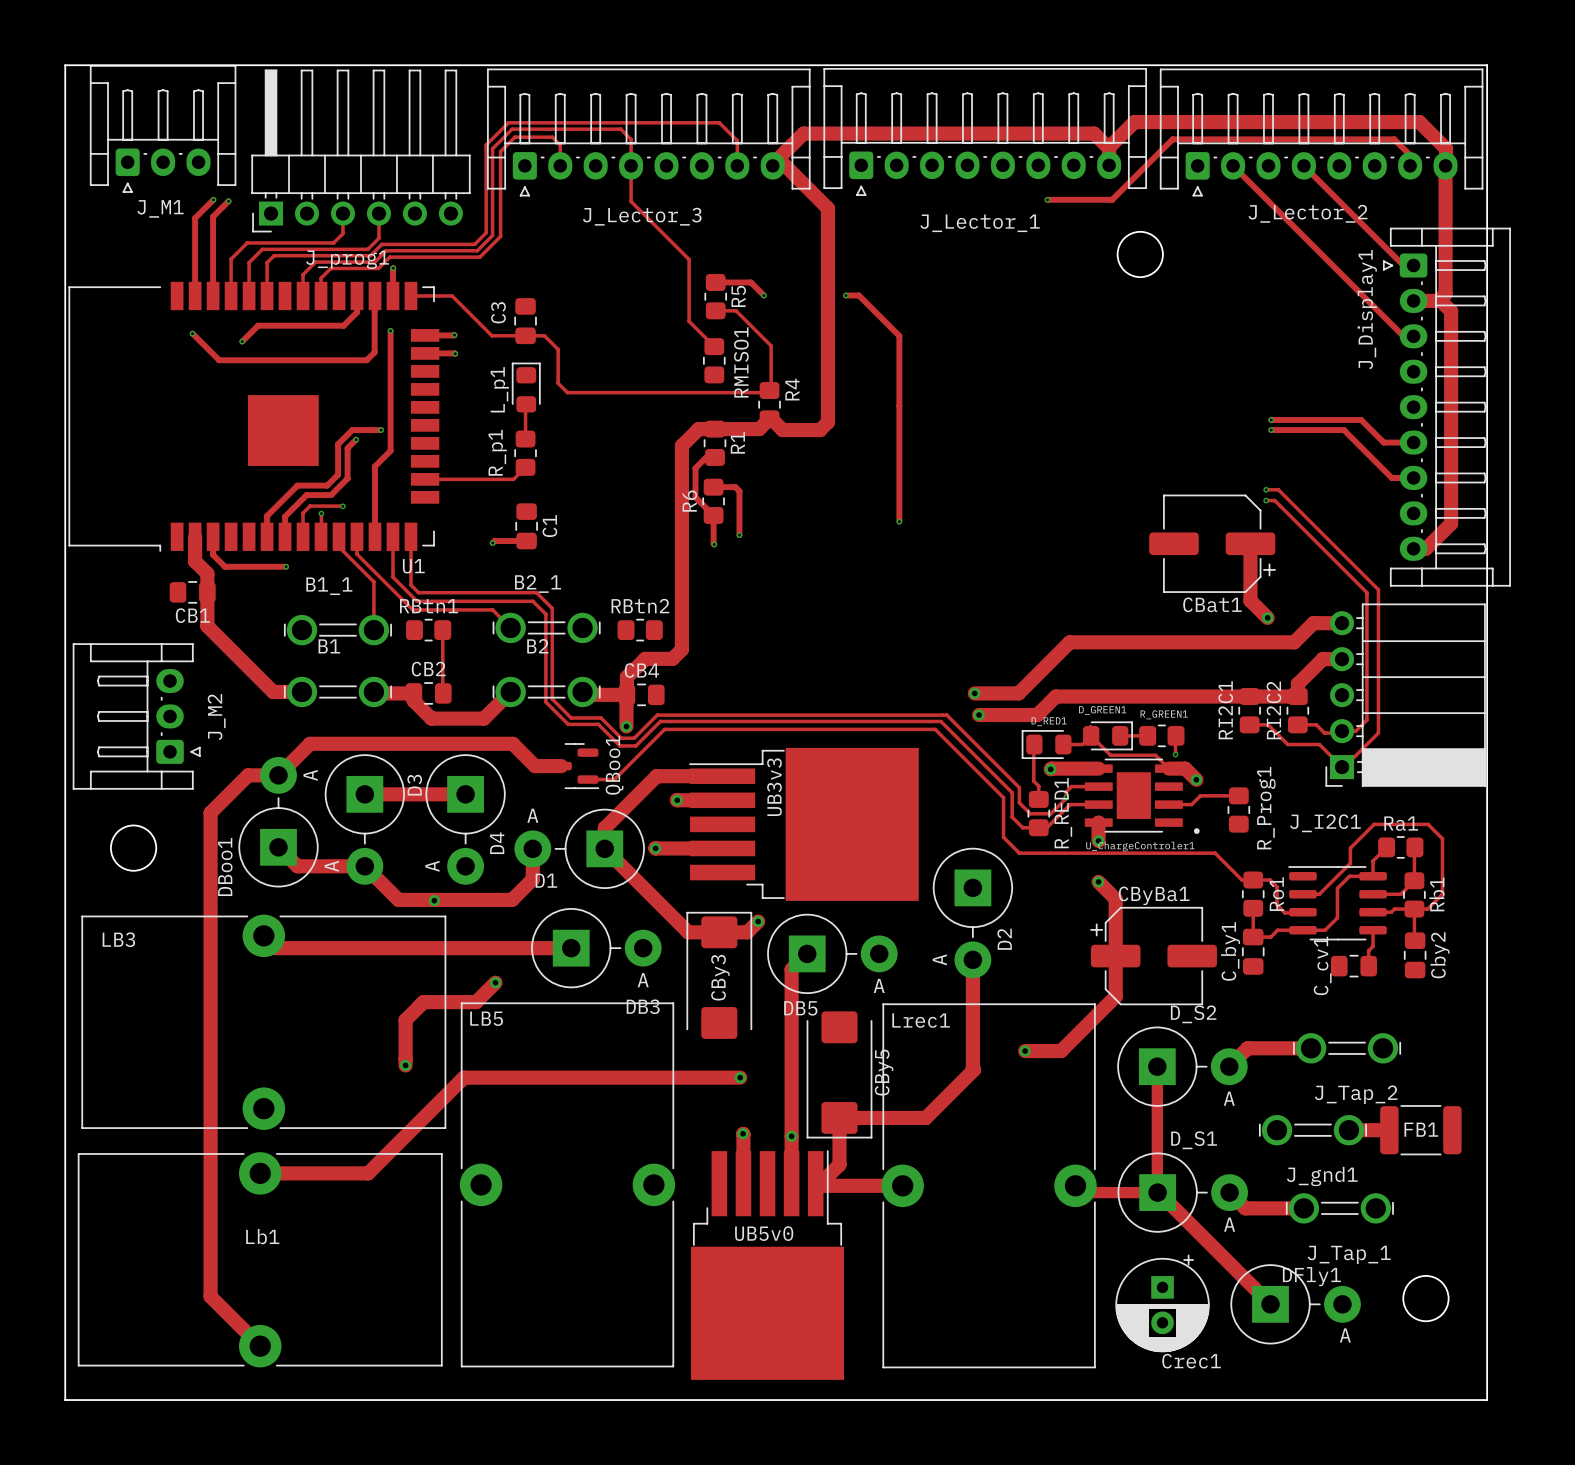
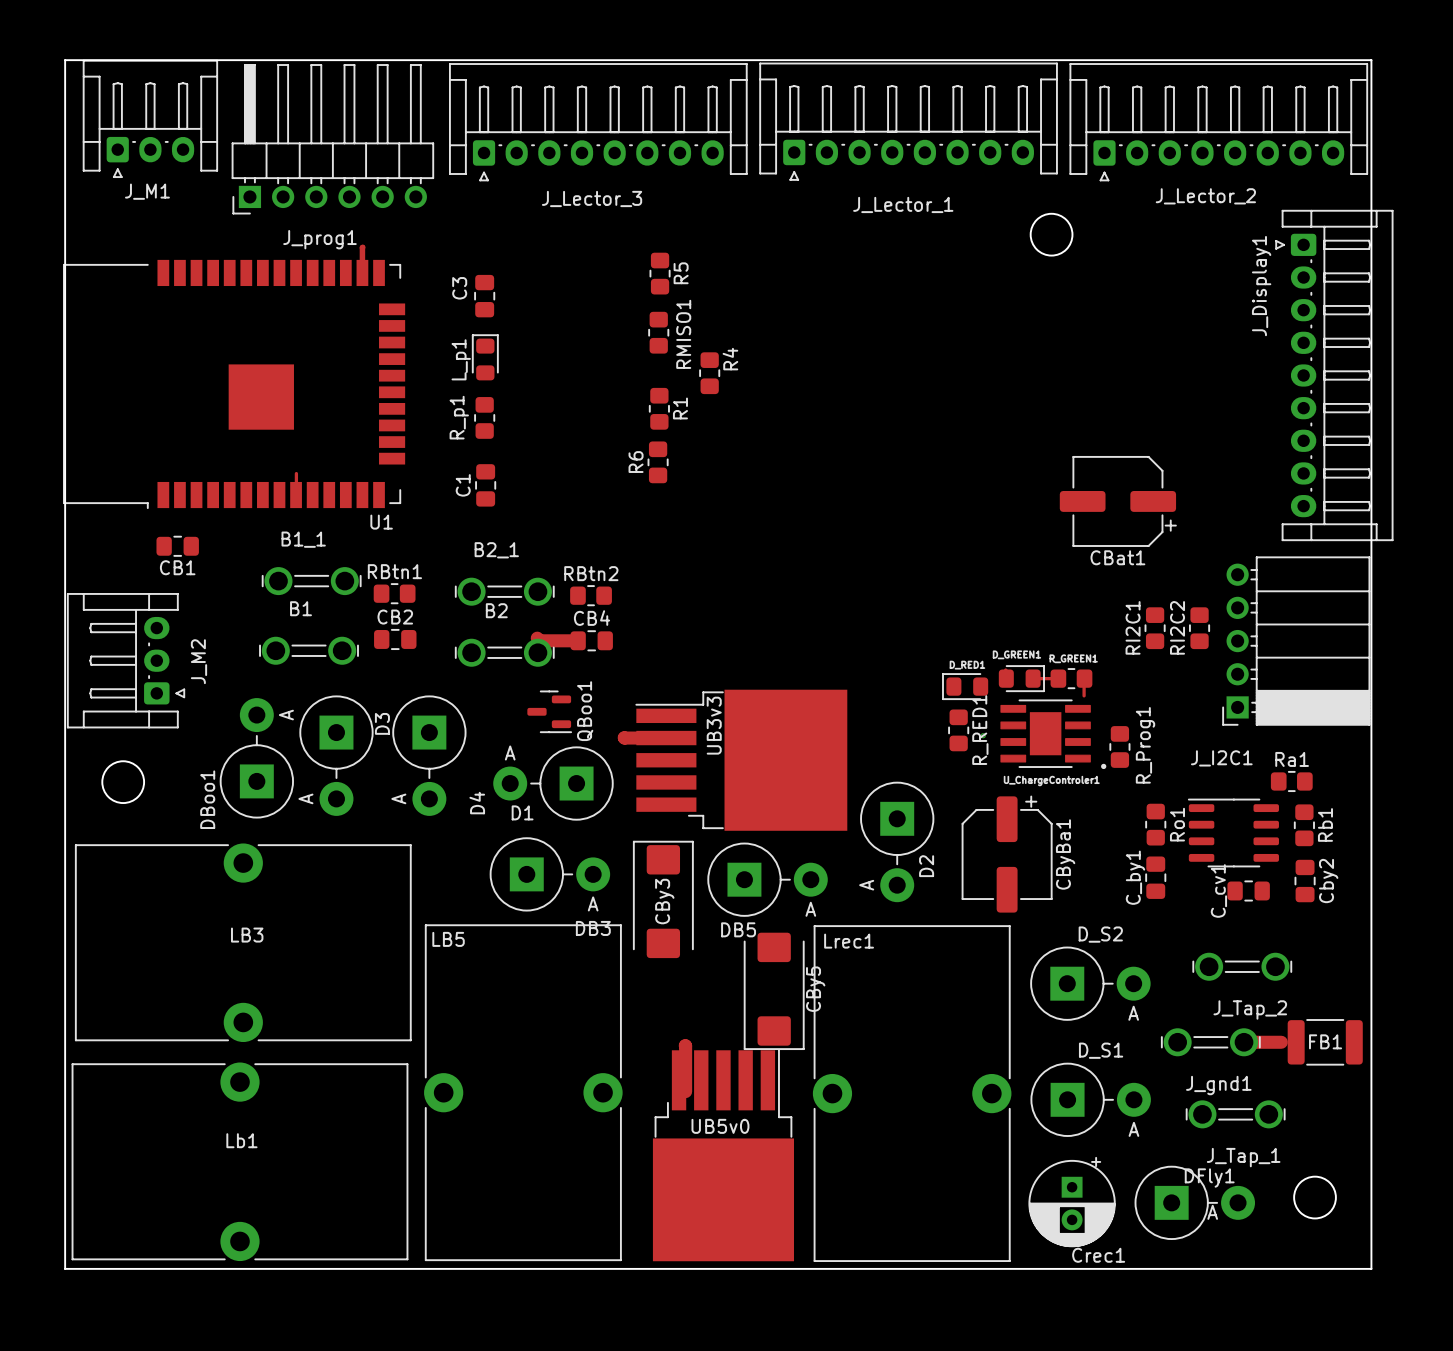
board edge: (70, 65) (65, 65) (65, 1400) (1487, 1400) (1487, 1375) -> (65, 60) (65, 1268) (1371, 1268)
track: (1109, 148) (1094, 133) (803, 133) (772, 164) (785, 165) (827, 208) (827, 422) (820, 430) (782, 430) (771, 418) (759, 429) (698, 429) (681, 445) (681, 649) (672, 658) (645, 658) (626, 677) (626, 726) -> none
track: (560, 165) (560, 145) (552, 137) (514, 137) (500, 151) (500, 236) (479, 257) (389, 257) (378, 268) (330, 268) (321, 278) (321, 295) -> none
track: (737, 165) (737, 140) (719, 122) (508, 122) (486, 145) (486, 232) (474, 244) (381, 244) (370, 255) (274, 255) (267, 262) (267, 295) -> none
track: (1109, 165) (1109, 147) (1134, 122) (1419, 122) (1446, 148) (1445, 293) (1438, 300) (1413, 300) -> none
track: (1233, 165) (1403, 336) (1413, 336) -> none
track: (1303, 165) (1403, 265) (1413, 265) -> none
track: (1410, 165) (1410, 155) (1394, 139) (1172, 139) (1112, 199) (1047, 199) -> none
track: (213, 199) (195, 218) (195, 295) -> none
via: (213, 199) -> none
via: (1047, 199) -> none
track: (228, 201) (213, 216) (213, 295) -> none
via: (228, 201) -> none
track: (342, 213) (342, 233) (333, 242) (247, 242) (231, 259) (231, 295) -> none
track: (378, 213) (378, 238) (367, 249) (262, 249) (249, 262) (249, 295) -> none
via: (393, 268) -> none
track: (715, 282) (750, 282) (763, 295) -> none
track: (303, 295) (303, 274) (315, 262) (374, 262) (386, 250) (477, 250) (492, 235) (492, 148) (512, 129) (620, 129) (631, 139) (631, 201) (689, 259) (689, 321) (714, 346) -> none
track: (357, 295) (357, 312) (343, 325) (258, 325) (242, 341) -> none
track: (375, 295) (374, 352) (366, 360) (219, 360) (192, 333) -> none
track: (410, 295) (452, 295) (491, 335) (544, 335) (558, 349) (558, 383) (567, 392) (767, 392) (771, 388) (771, 345) (736, 310) (715, 310) -> none
via: (763, 295) -> none
track: (845, 295) (858, 295) (899, 335) (899, 521) -> none
via: (845, 295) -> none
track: (1439, 299) (1451, 311) (1451, 523) (1425, 548) (1413, 548) -> none
track: (390, 330) (390, 450) (375, 466) (375, 536) -> none
via: (390, 330) -> none
via: (192, 333) -> none
track: (454, 335) (425, 335) -> none
via: (454, 335) -> none
via: (242, 341) -> none
track: (425, 353) (455, 353) -> none
via: (455, 353) -> none
track: (526, 404) (525, 439) -> none
track: (1271, 419) (1361, 419) (1383, 442) (1413, 442) -> none
via: (1271, 419) -> none
track: (381, 430) (352, 430) (338, 444) (338, 474) (327, 485) (297, 485) (267, 516) (267, 536) -> none
via: (381, 430) -> none
track: (1271, 430) (1343, 430) (1391, 477) (1413, 477) -> none
via: (1271, 430) -> none
track: (356, 439) (347, 448) (347, 478) (331, 495) (306, 495) (285, 516) (285, 536) -> none
via: (356, 439) -> none
track: (715, 457) (706, 457) (695, 468) (695, 497) (713, 515) (714, 544) -> none
track: (525, 467) (513, 479) (425, 479) -> none
track: (713, 487) (735, 487) (739, 491) (739, 535) -> none
track: (1266, 489) (1278, 489) (1378, 589) (1378, 733) (1344, 767) (1342, 767) (1319, 744) (1287, 744) (1268, 724) (1249, 724) -> none
via: (1266, 489) -> none
track: (1266, 500) (1274, 500) (1366, 592) (1366, 720) (1355, 731) (1342, 731) (1340, 733) (1324, 733) (1316, 724) (1297, 724) -> none
via: (1266, 500) -> none
track: (342, 506) (310, 506) (303, 513) (303, 536) -> none
via: (342, 506) -> none
via: (321, 513) -> none
via: (899, 521) -> none
C1 name position: C1 (549, 526) -> C1 (463, 485)
via: (739, 535) -> none
track: (195, 536) (195, 561) (207, 573) (207, 626) (273, 691) (301, 691) -> none
track: (213, 536) (213, 554) (224, 566) (286, 566) -> none
track: (339, 536) (339, 546) (373, 581) (373, 630) -> none
track: (357, 536) (357, 554) (412, 609) (492, 609) (510, 627) -> none
track: (393, 536) (392, 576) (417, 601) (532, 601) (545, 614) (545, 702) (568, 724) (598, 724) (620, 745) (635, 745) (660, 721) (940, 721) (1012, 792) (1012, 817) (1022, 827) (1046, 827) (1070, 804) (1098, 804) -> none
track: (410, 536) (410, 585) (418, 592) (536, 592) (552, 608) (552, 699) (571, 717) (601, 717) (621, 738) (634, 738) (657, 715) (946, 715) (1019, 787) (1019, 802) (1030, 813) (1050, 813) (1066, 798) (1066, 792) (1071, 786) (1098, 786) -> none
track: (526, 541) (494, 541) (492, 543) -> none
via: (492, 543) -> none
track: (1250, 543) (1250, 600) (1267, 617) -> none
via: (714, 544) -> none
via: (286, 566) -> none
via: (1267, 617) -> none
track: (1342, 623) (1313, 623) (1294, 642) (1069, 642) (1018, 693) (974, 693) -> none
B2_1 position: (546, 627) -> (504, 591)
RBtn1 position: (428, 630) -> (394, 593)
track: (442, 630) (443, 693) -> none
RBtn2 position: (640, 630) -> (591, 595)
track: (1342, 659) (1323, 658) (1297, 684) (1297, 696) (1055, 696) (1037, 715) (979, 715) -> none
B1 position: (337, 691) -> (309, 650)
track: (373, 691) (413, 693) (413, 701) (431, 718) (484, 718) (510, 691) -> none
B2 position: (546, 691) -> (504, 652)
via: (974, 693) -> none
RI2C1 position: (1249, 710) -> (1155, 628)
RI2C2 position: (1297, 710) -> (1199, 628)
via: (979, 715) -> none
via: (626, 726) -> none
track: (1034, 744) (1033, 781) (1038, 786) (1038, 799) (1034, 794) -> none
track: (1063, 744) (1082, 744) (1091, 735) (1110, 755) (1155, 755) (1168, 768) (1185, 768) (1196, 779) -> none
via: (1175, 754) -> none
track: (561, 766) (535, 766) (512, 743) (310, 743) (278, 775) (248, 775) (210, 812) (210, 1296) (260, 1346) -> none
QBoo1 position: (575, 766) -> (549, 711)
track: (1098, 768) (1050, 769) -> none
via: (1050, 769) -> none
track: (722, 776) (656, 776) (604, 828) (604, 848) (688, 932) (747, 932) (758, 921) -> none
track: (587, 779) (614, 779) (664, 729) (935, 729) (1003, 797) (1003, 837) (1019, 853) (1215, 853) (1241, 880) (1270, 880) (1276, 886) (1276, 904) (1284, 912) (1302, 912) -> none
via: (1196, 779) -> none
track: (364, 794) (465, 794) -> none
track: (1238, 795) (1200, 795) (1191, 804) (1168, 804) -> none
via: (677, 800) -> none
R_Prog1 position: (1238, 809) -> (1119, 746)
R_RED1 position: (1038, 813) -> (958, 730)
track: (1098, 822) (1098, 840) -> none
via: (1098, 840) -> none
D4 name position: D4 (497, 843) -> D4 (477, 803)
track: (278, 847) (297, 866) (364, 866) (398, 899) (512, 899) (532, 879) (532, 848) -> none
track: (1386, 847) (1373, 860) (1373, 876) (1349, 876) (1337, 888) (1337, 917) (1325, 930) (1277, 930) (1270, 937) (1253, 937) (1253, 908) -> none
track: (1414, 847) (1414, 880) (1400, 894) (1373, 894) -> none
D1 position: (579, 848) -> (553, 783)
track: (655, 848) (722, 848) -> none
via: (655, 848) -> none
track: (1098, 881) (1115, 899) (1115, 996) (1061, 1051) (1025, 1051) -> none
via: (1098, 881) -> none
track: (1302, 894) (1319, 894) (1350, 863) (1350, 848) (1374, 824) (1428, 824) (1442, 838) (1442, 894) (1427, 909) (1394, 909) (1391, 912) (1373, 912) -> none
via: (434, 900) -> none
track: (1414, 909) (1415, 940) -> none
via: (758, 921) -> none
track: (1373, 930) (1373, 946) (1368, 950) (1368, 966) -> none
track: (263, 935) (276, 948) (571, 948) -> none
LB3 name position: LB3 (118, 939) -> LB3 (247, 935)
track: (807, 953) (791, 969) (791, 1183) -> none
CByBa1 rotation: 0° (1153, 956) -> 90° clockwise (1007, 854)
track: (972, 959) (974, 1069) (925, 1117) (839, 1117) (839, 1164) (820, 1183) (815, 1183) (817, 1185) (902, 1185) -> none
track: (495, 982) (476, 1002) (423, 1002) (405, 1020) (405, 1065) -> none
via: (495, 982) -> none
track: (1311, 1048) (1247, 1048) (1229, 1066) -> none
via: (1025, 1051) -> none
via: (405, 1065) -> none
track: (1157, 1066) (1157, 1192) -> none
track: (740, 1077) (463, 1077) (368, 1173) (260, 1173) -> none
via: (740, 1077) -> none
FB1 position: (1420, 1130) -> (1325, 1042)
via: (743, 1133) -> none
via: (791, 1136) -> none
track: (1075, 1185) (1082, 1192) (1157, 1192) -> none
track: (1157, 1192) (1270, 1304) -> none
track: (1229, 1192) (1245, 1208) (1303, 1208) -> none
UB5v0 position: (767, 1265) -> (723, 1155)
DFly1 text position: A (1345, 1335) -> A (1212, 1212)

